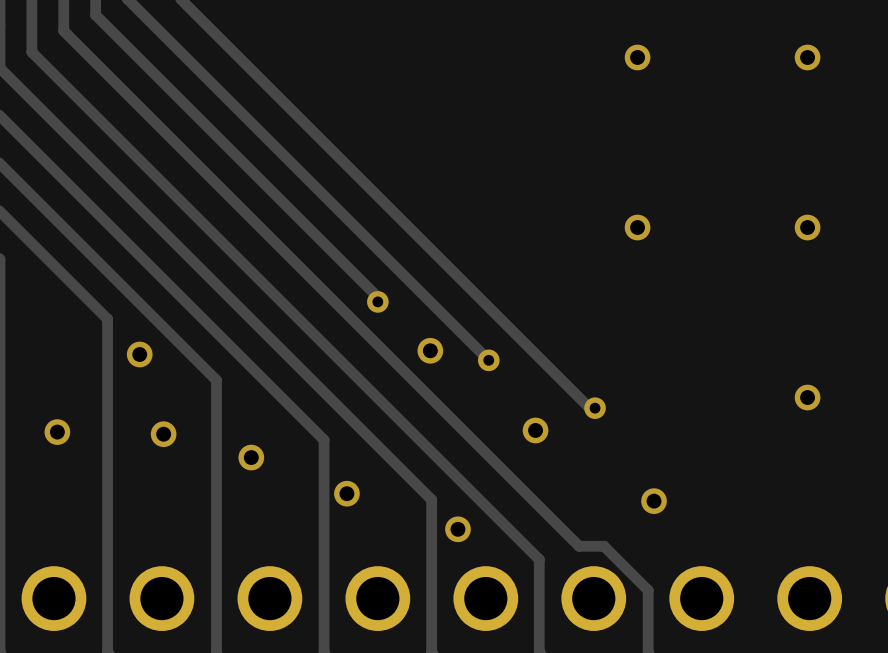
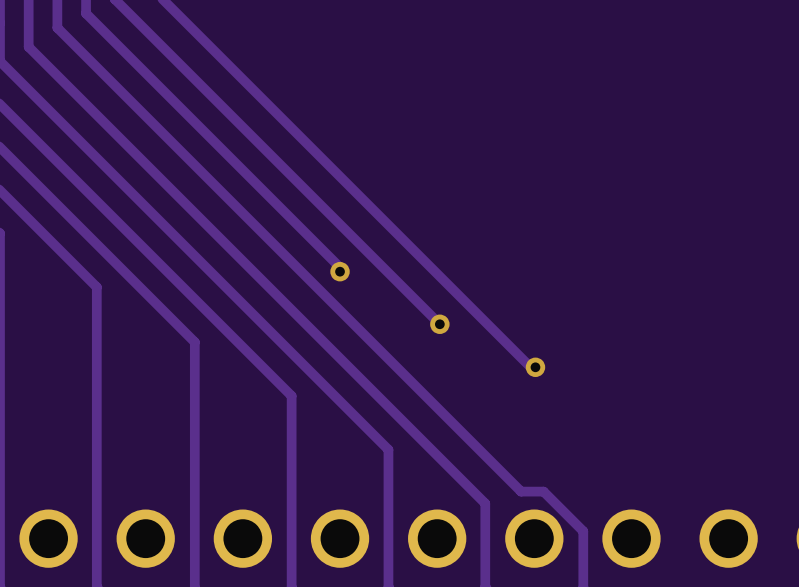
via: (637, 57) -> none
via: (807, 57) -> none
via: (637, 227) -> none
via: (807, 227) -> none
via: (430, 350) -> none
via: (139, 354) -> none
via: (807, 397) -> none
via: (535, 430) -> none
via: (57, 432) -> none
via: (163, 434) -> none
via: (251, 457) -> none
via: (346, 493) -> none
via: (654, 501) -> none
via: (457, 529) -> none

